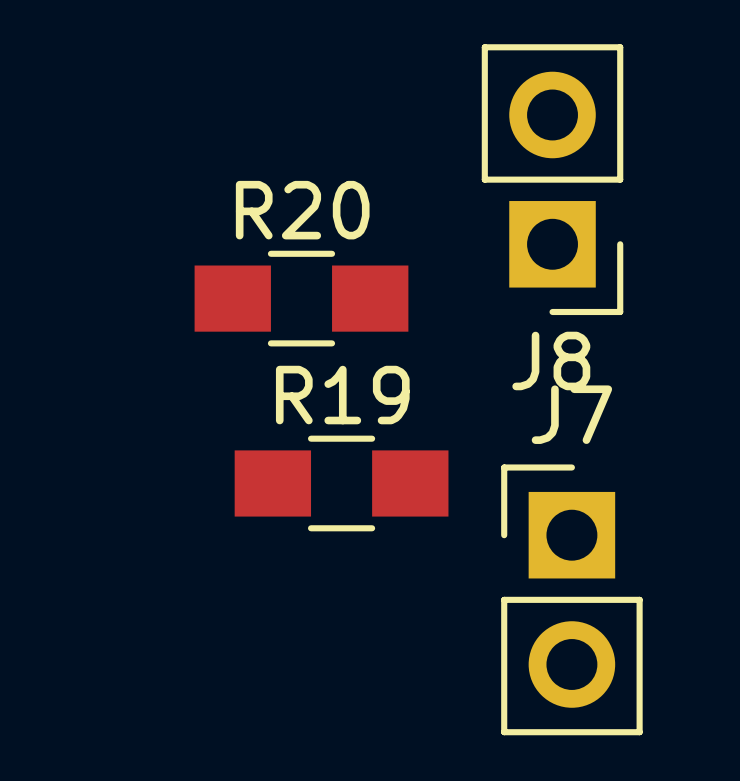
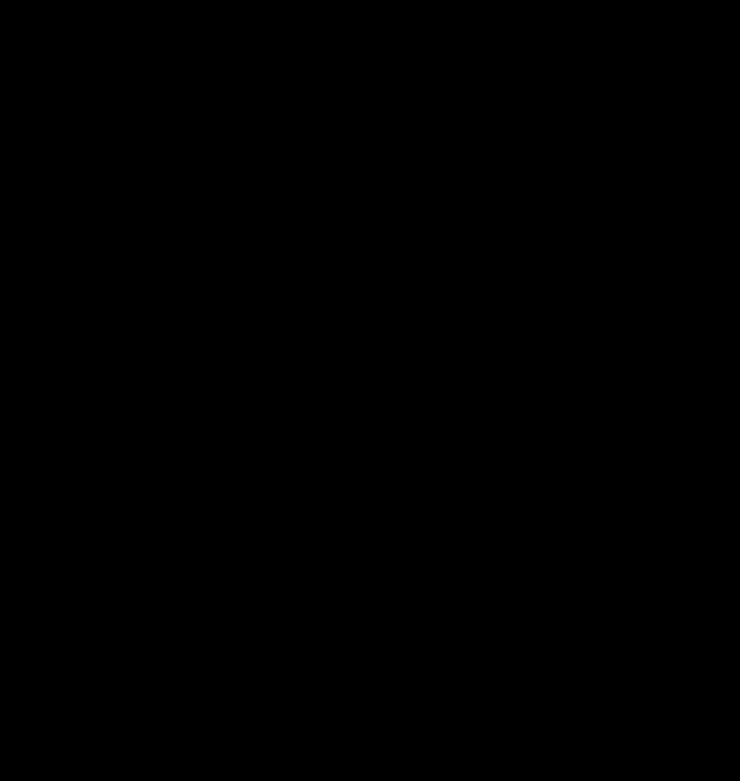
J8: (552, 179) -> none
R20: (301, 298) -> none
R19: (341, 483) -> none
J7: (571, 599) -> none

